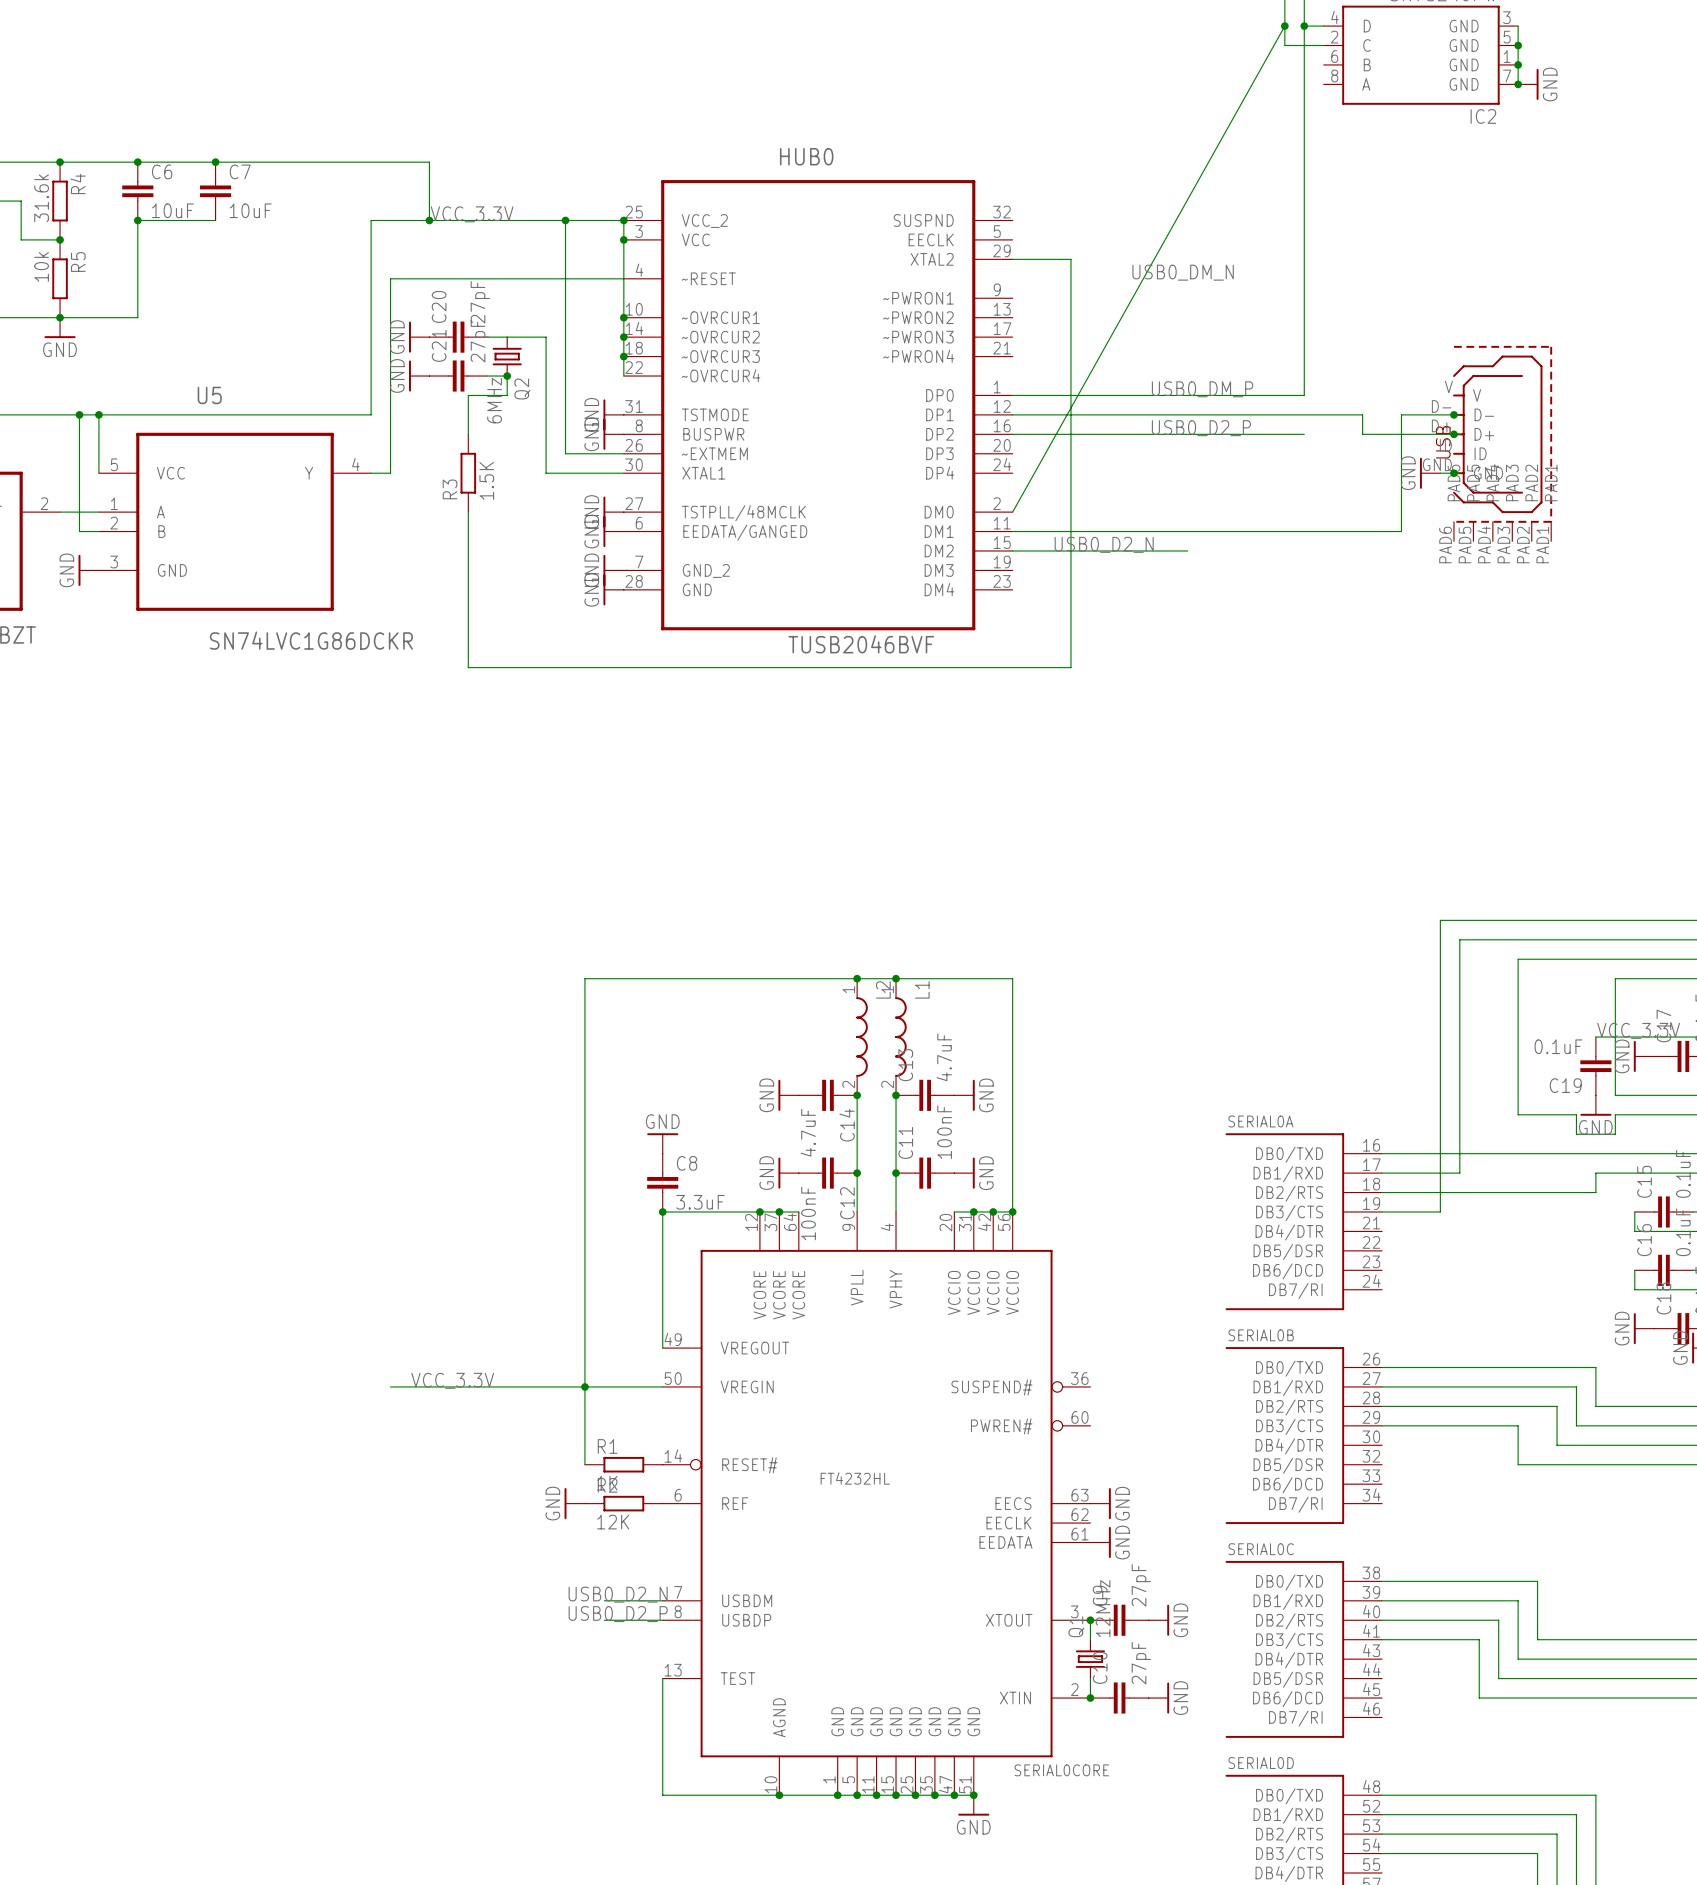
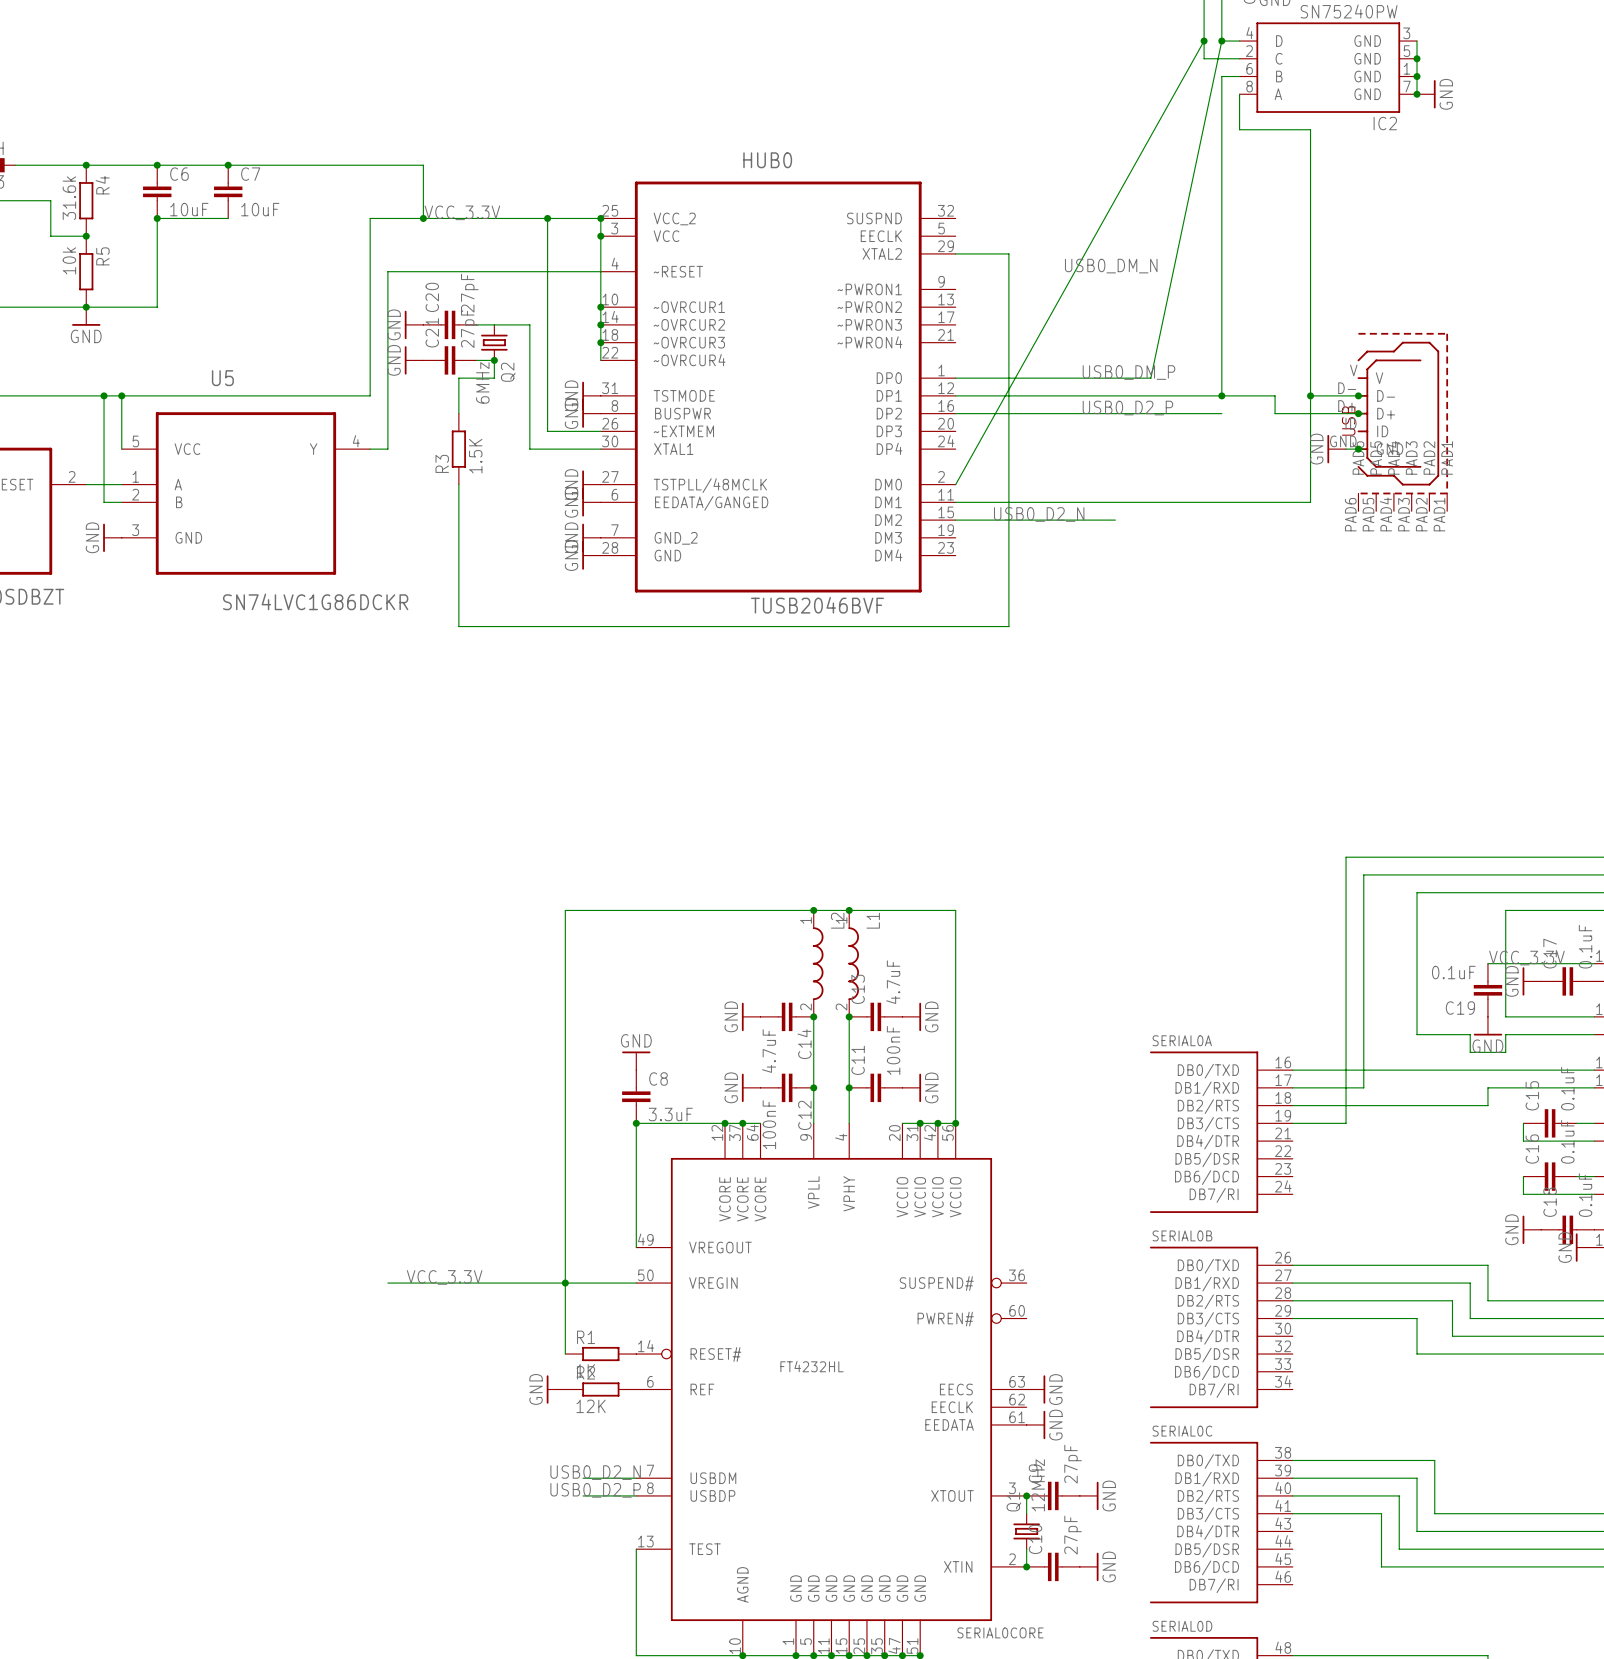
wire: (1304, 26) (1304, 64) -> (1239, 76) (1221, 76)
wire: none -> (1221, 41) (1150, 378)
wire: none -> (1239, 94) (1239, 129) (1310, 129) (1310, 395)
wire: (1226, 395) (1304, 395) -> (1221, 395) (1221, 378)
junction: none -> (1221, 395)
junction: none -> (1310, 395)

